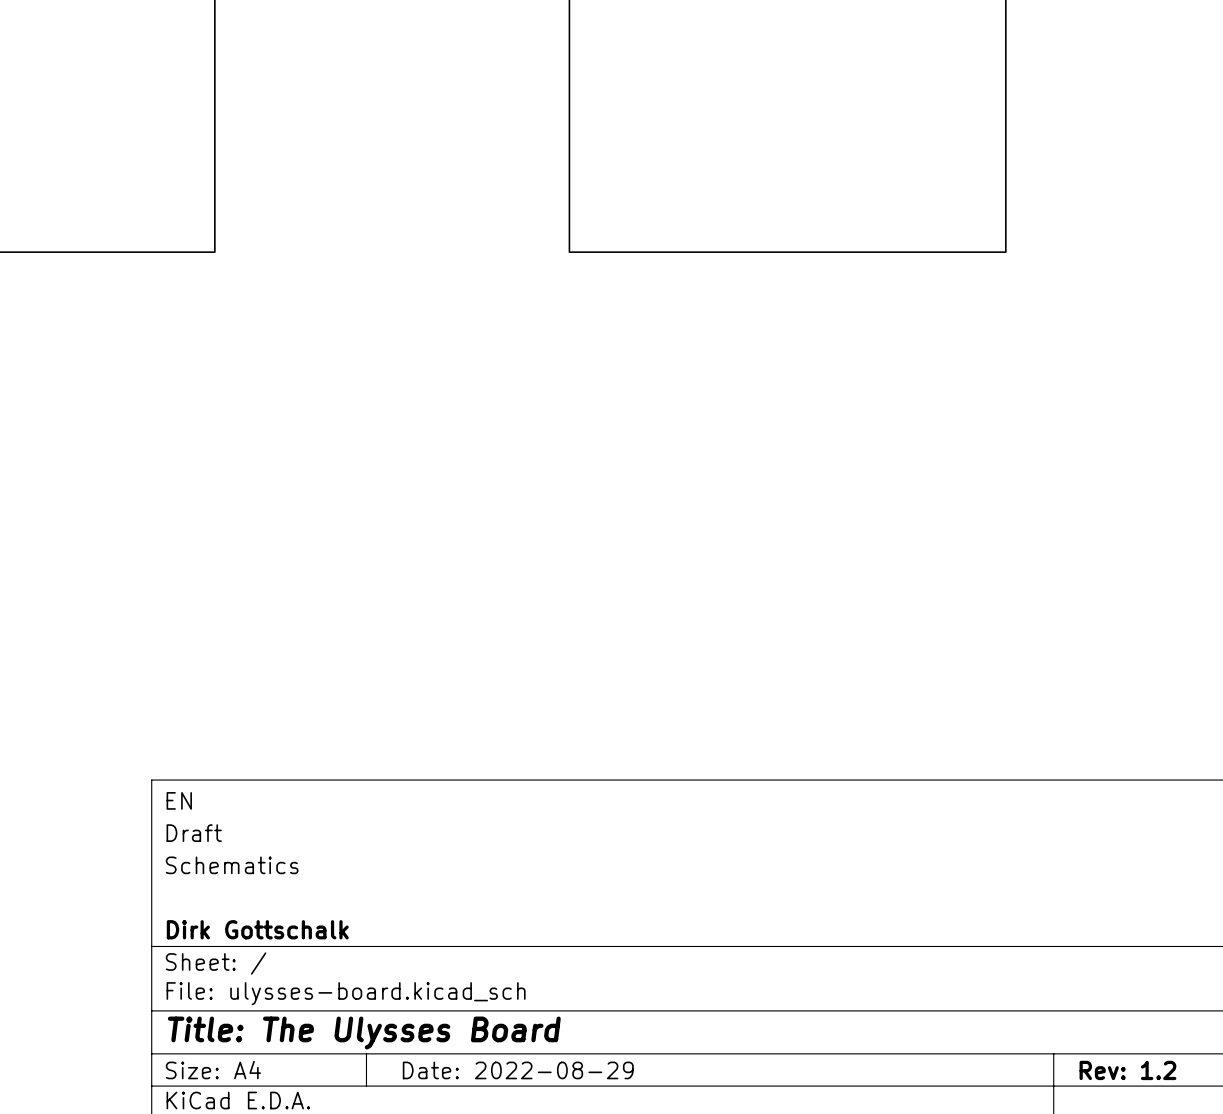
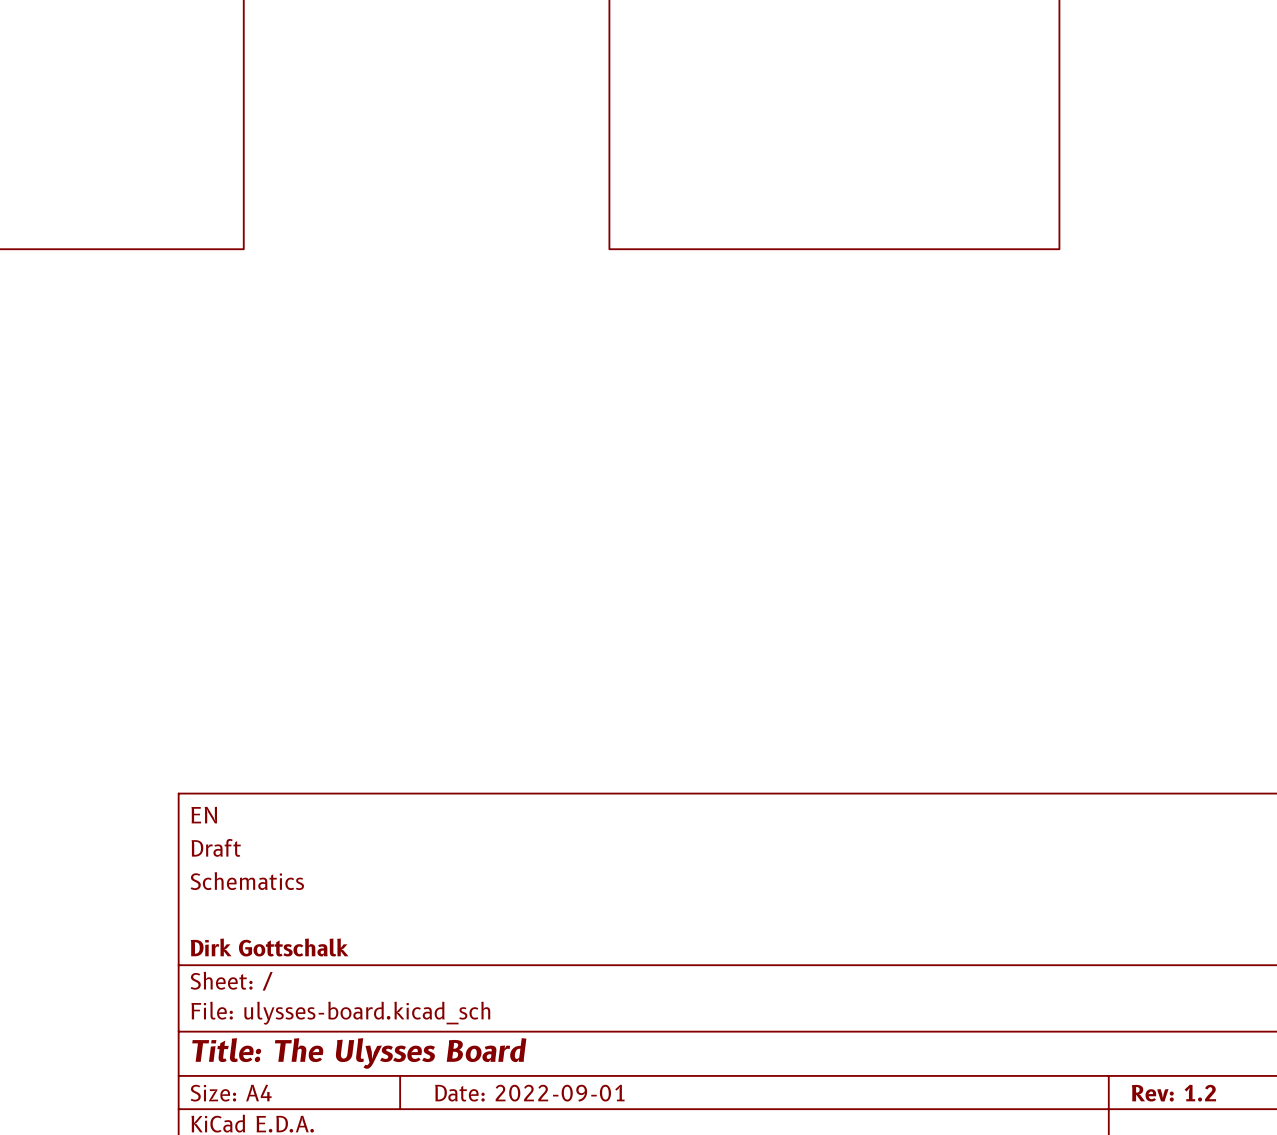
title block: Date: 2022-08-29 (518, 1070) -> Date: 2022-09-01 (529, 1093)

